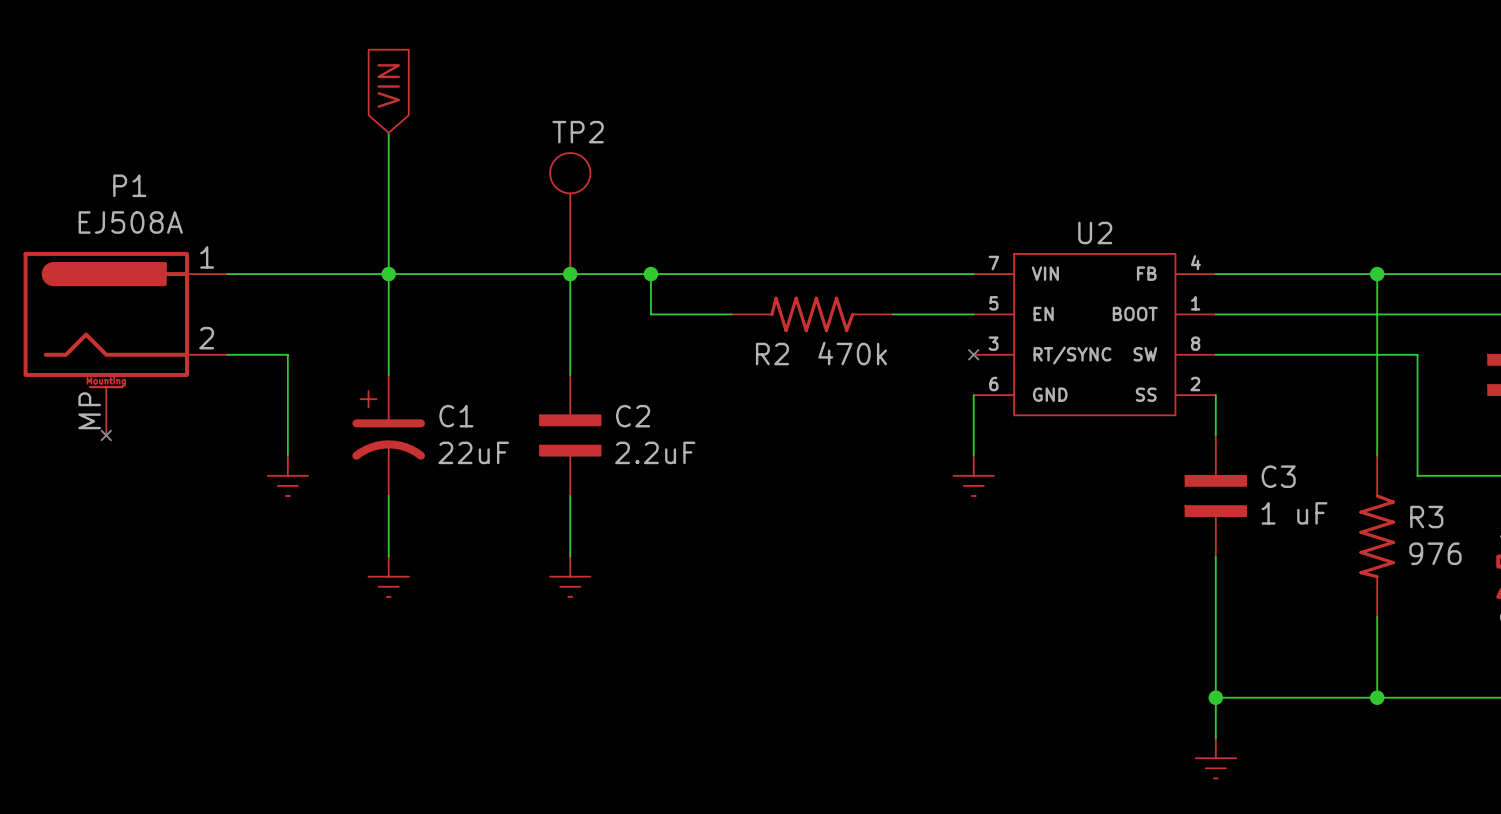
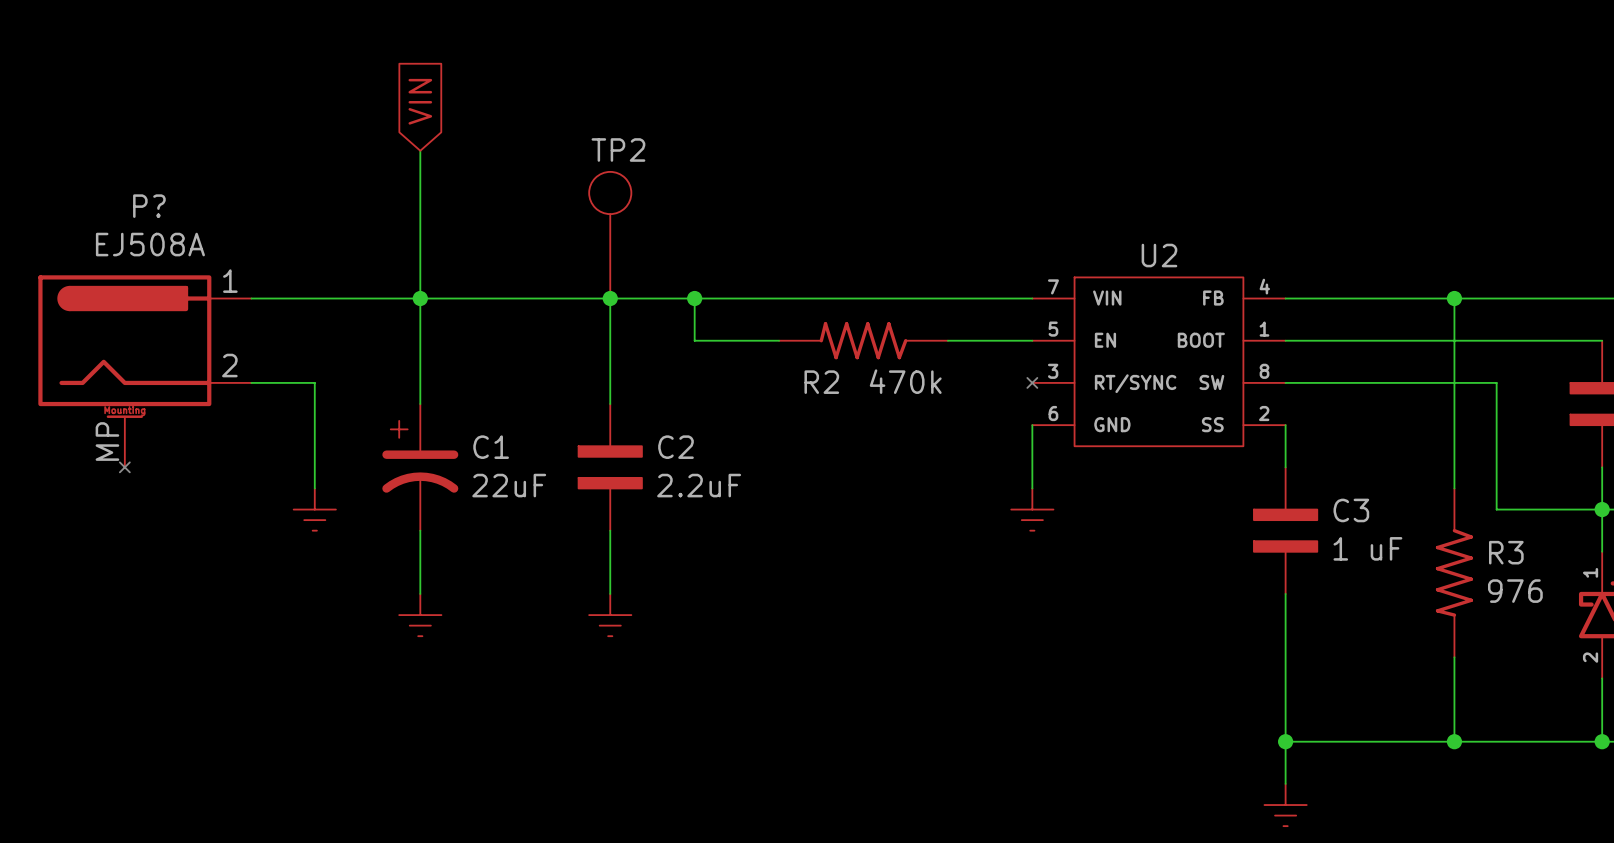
P1 name: P1 (129, 185) -> P? (149, 206)

